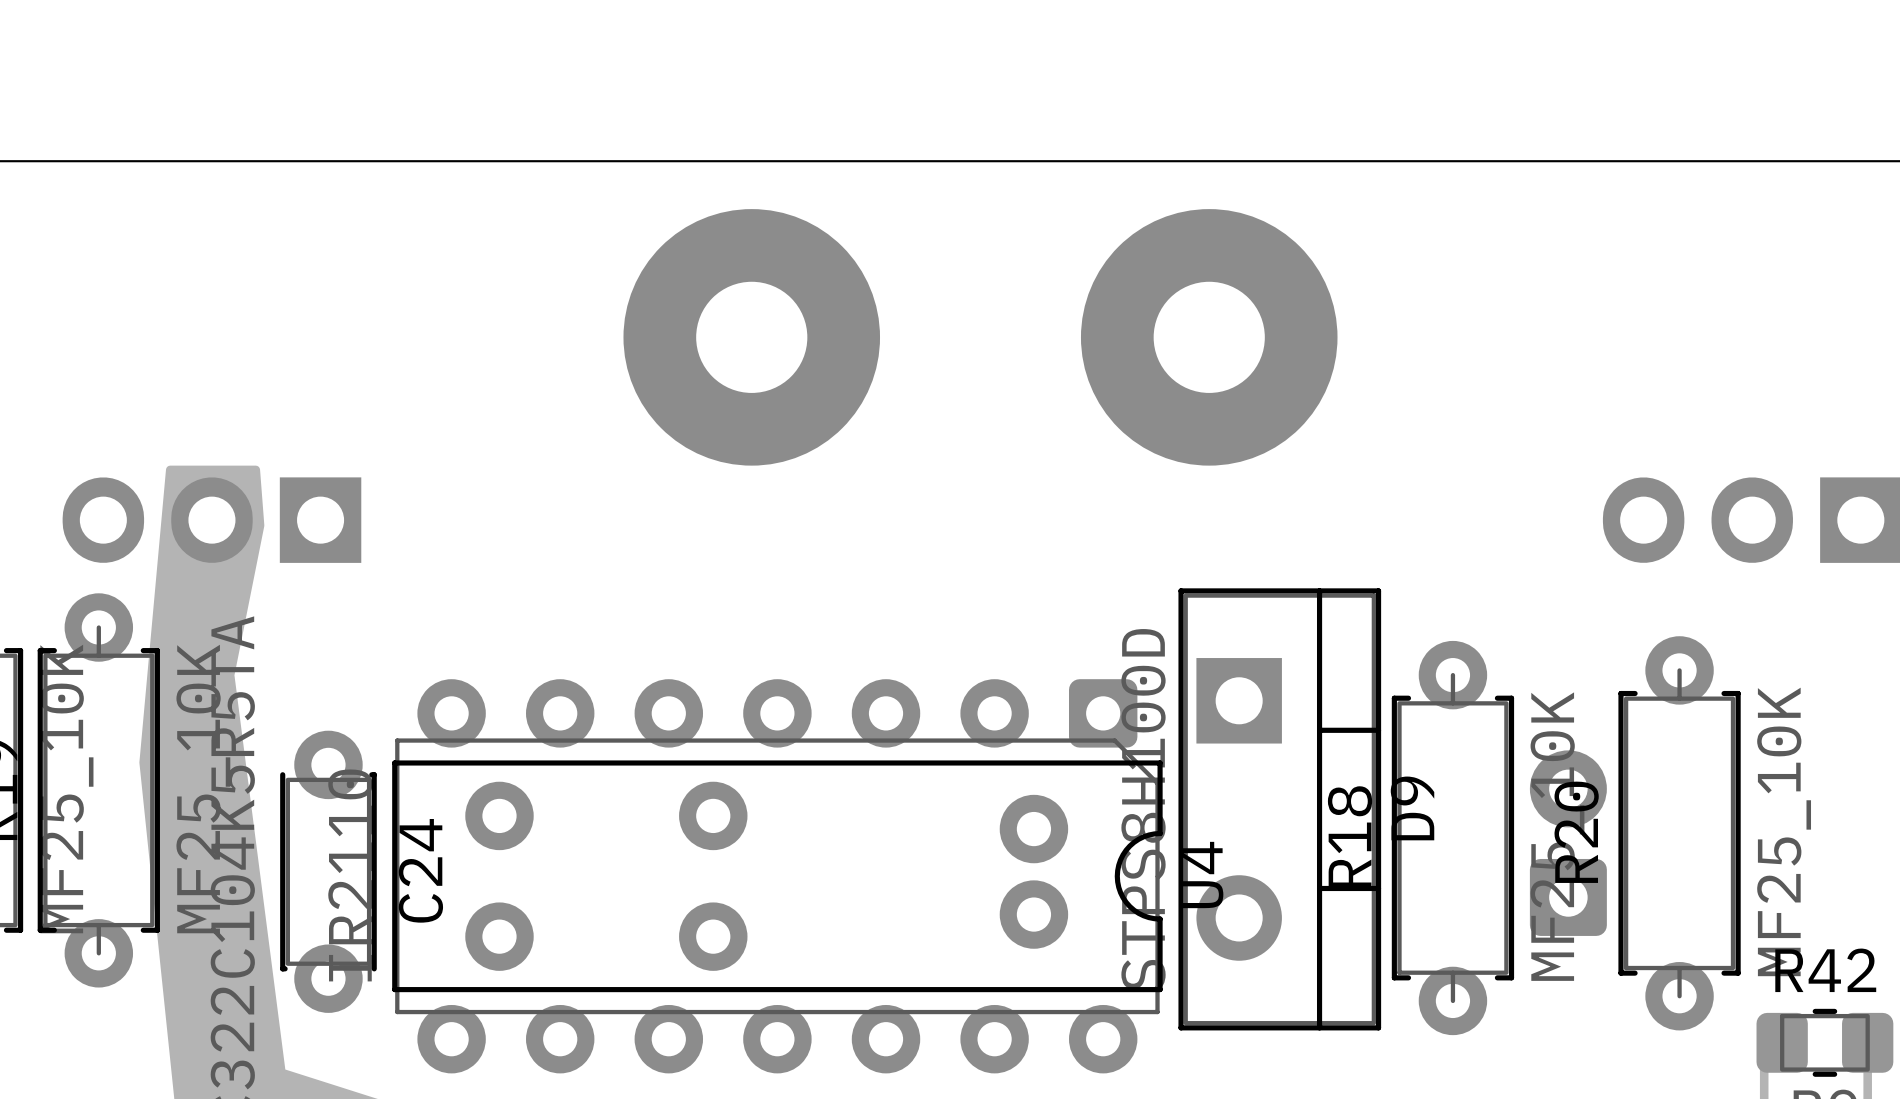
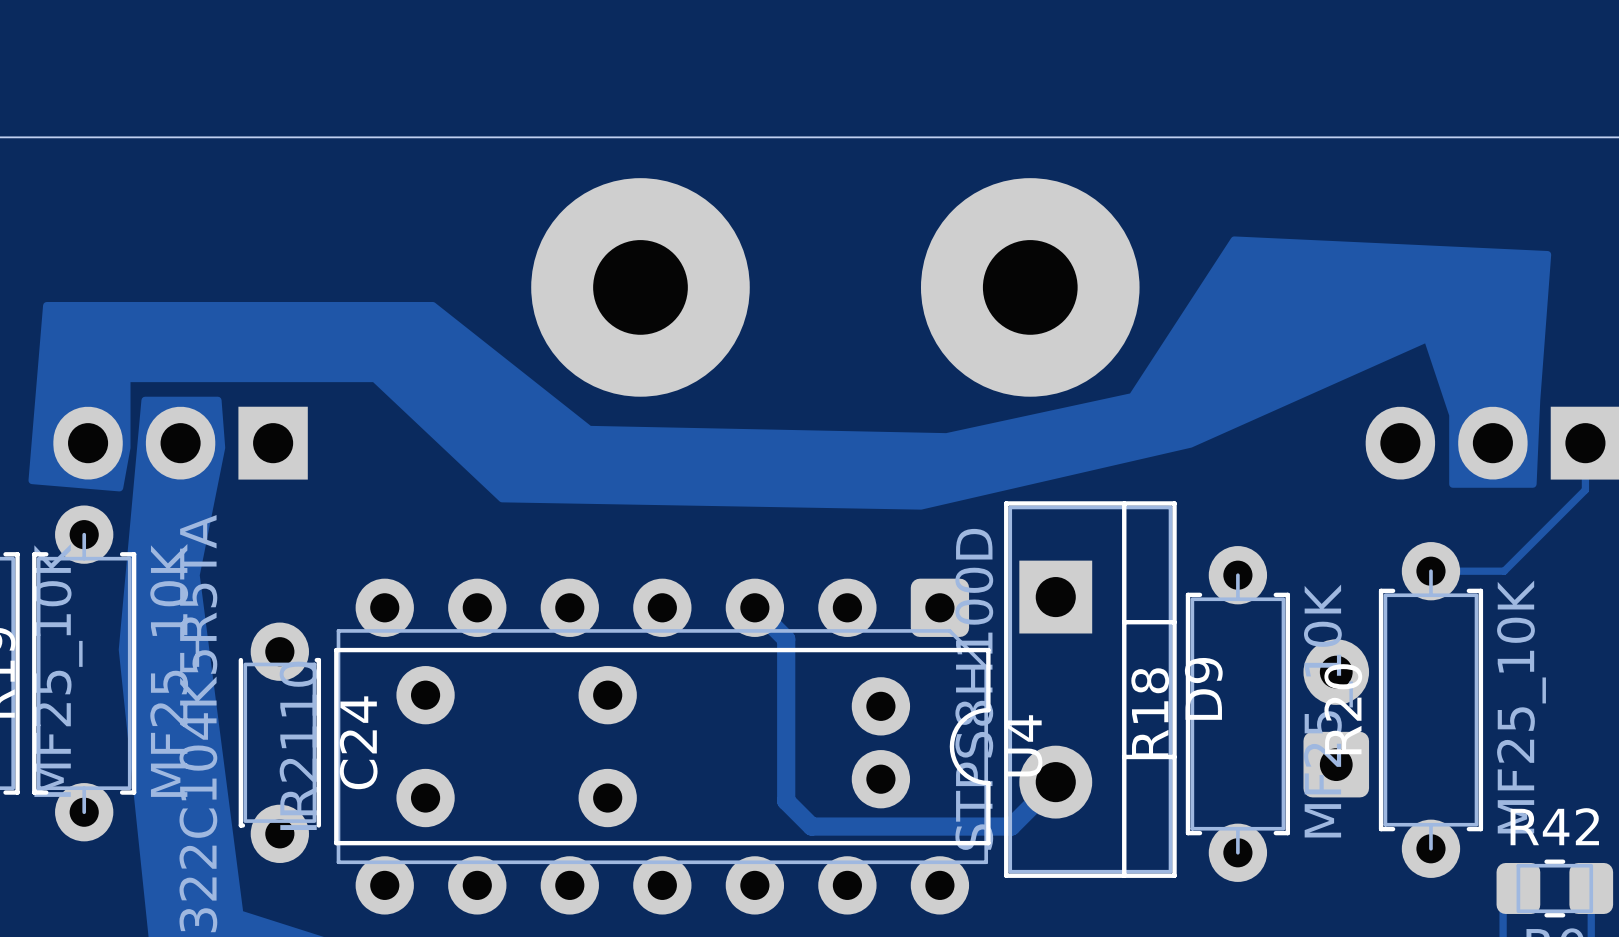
drawing: none -> [28, 236, 1552, 510]
track: none -> (1585, 443) (1585, 489) (1504, 571) (1430, 571)
track: none -> (754, 607) (786, 639) (786, 801) (811, 826) (1011, 826) (1055, 782)

